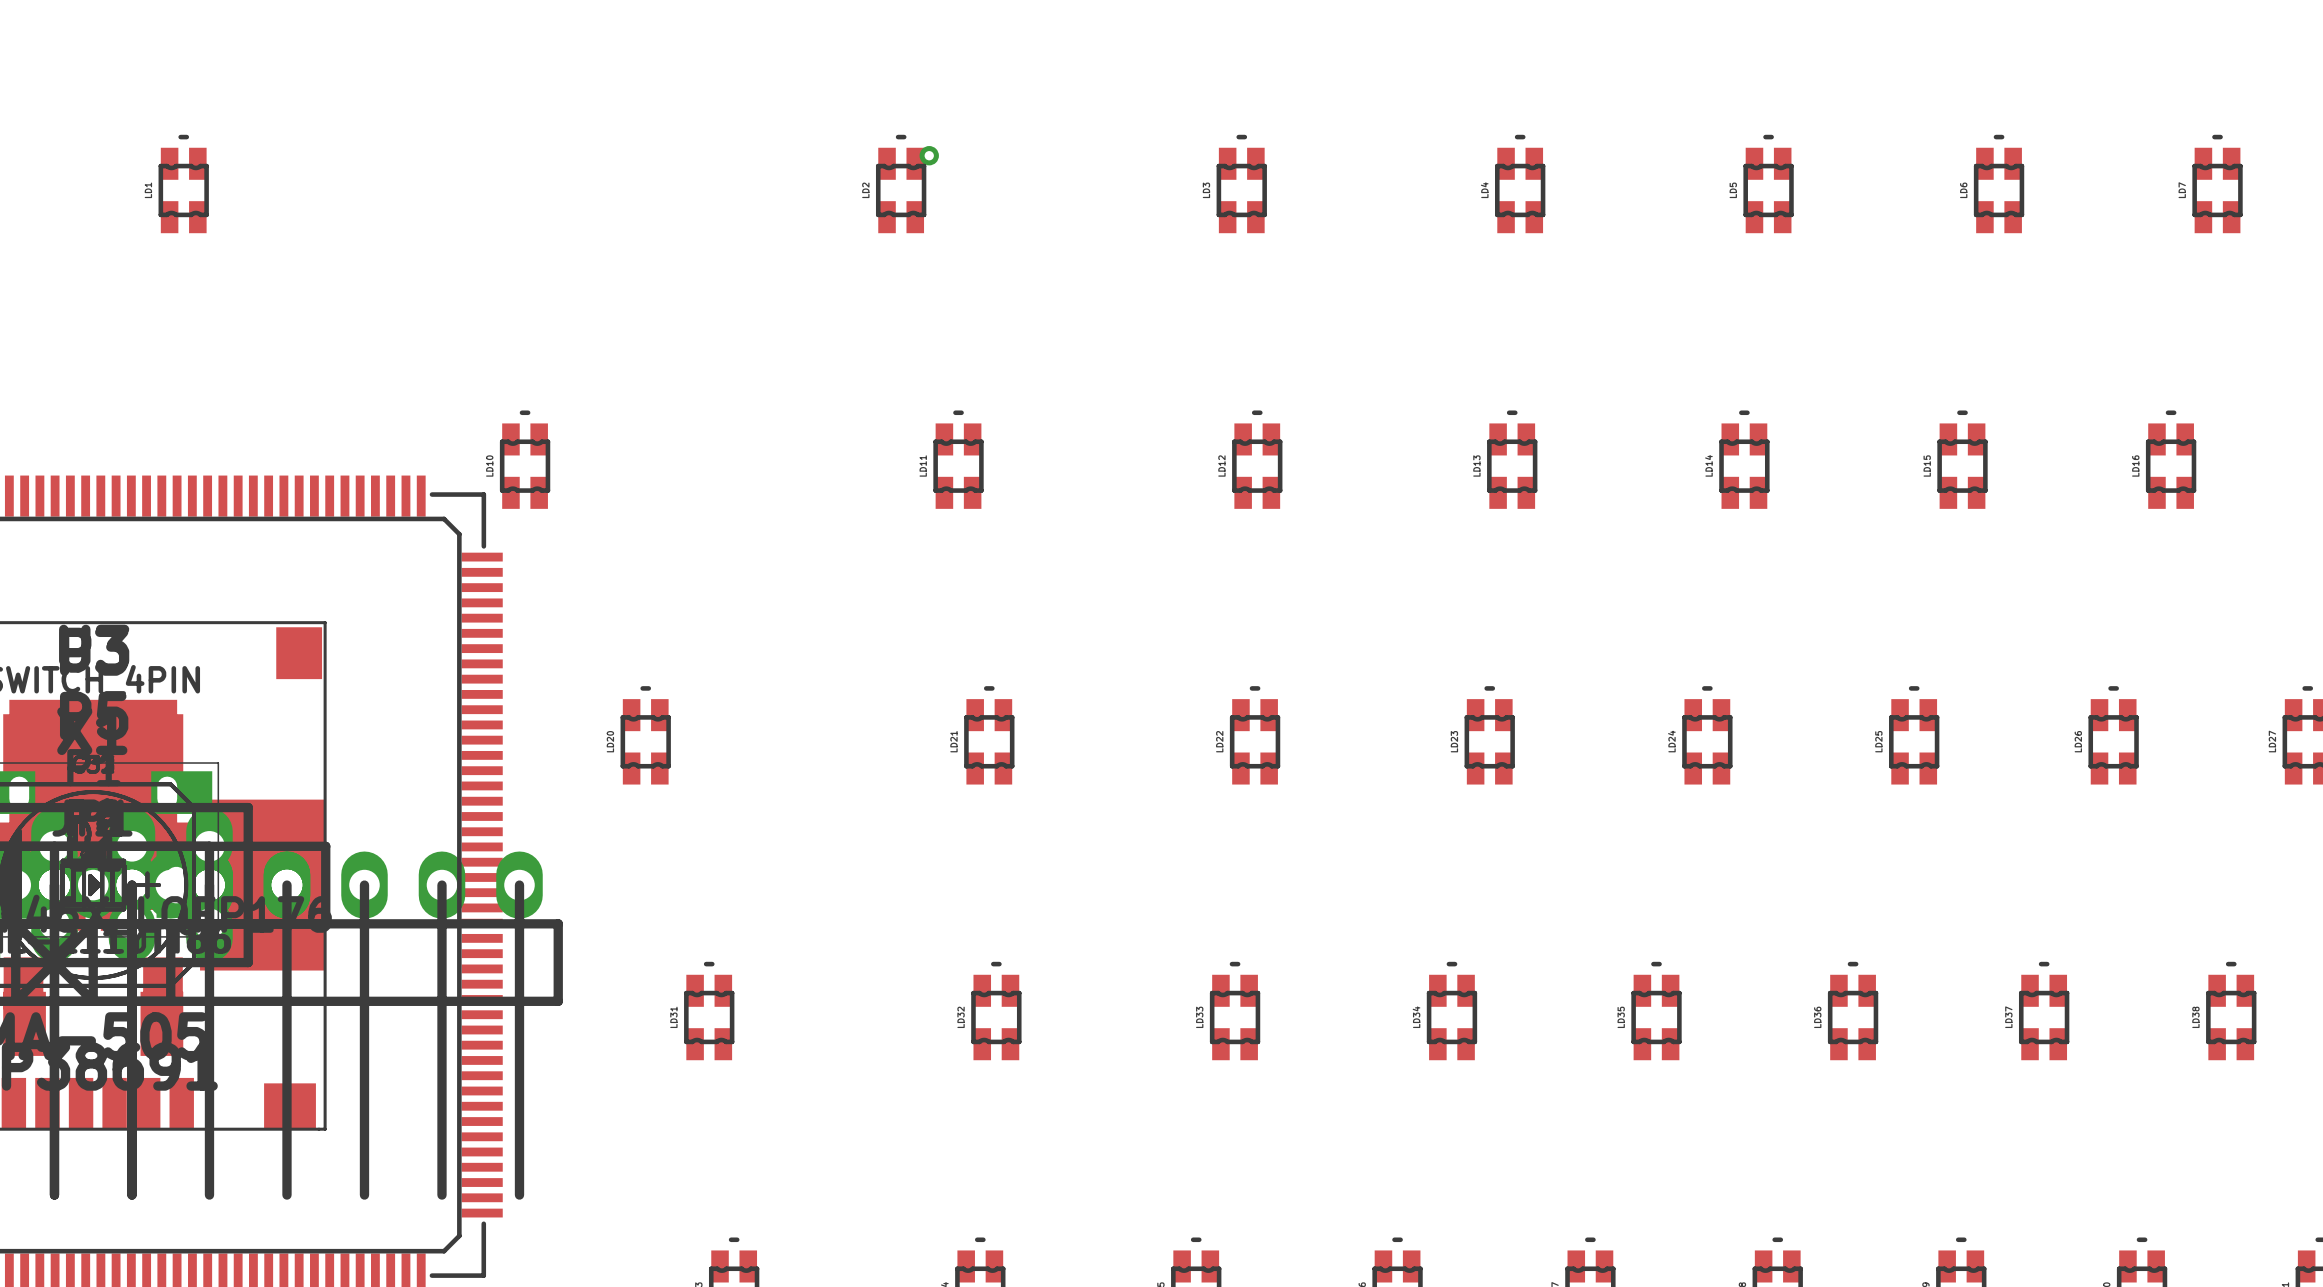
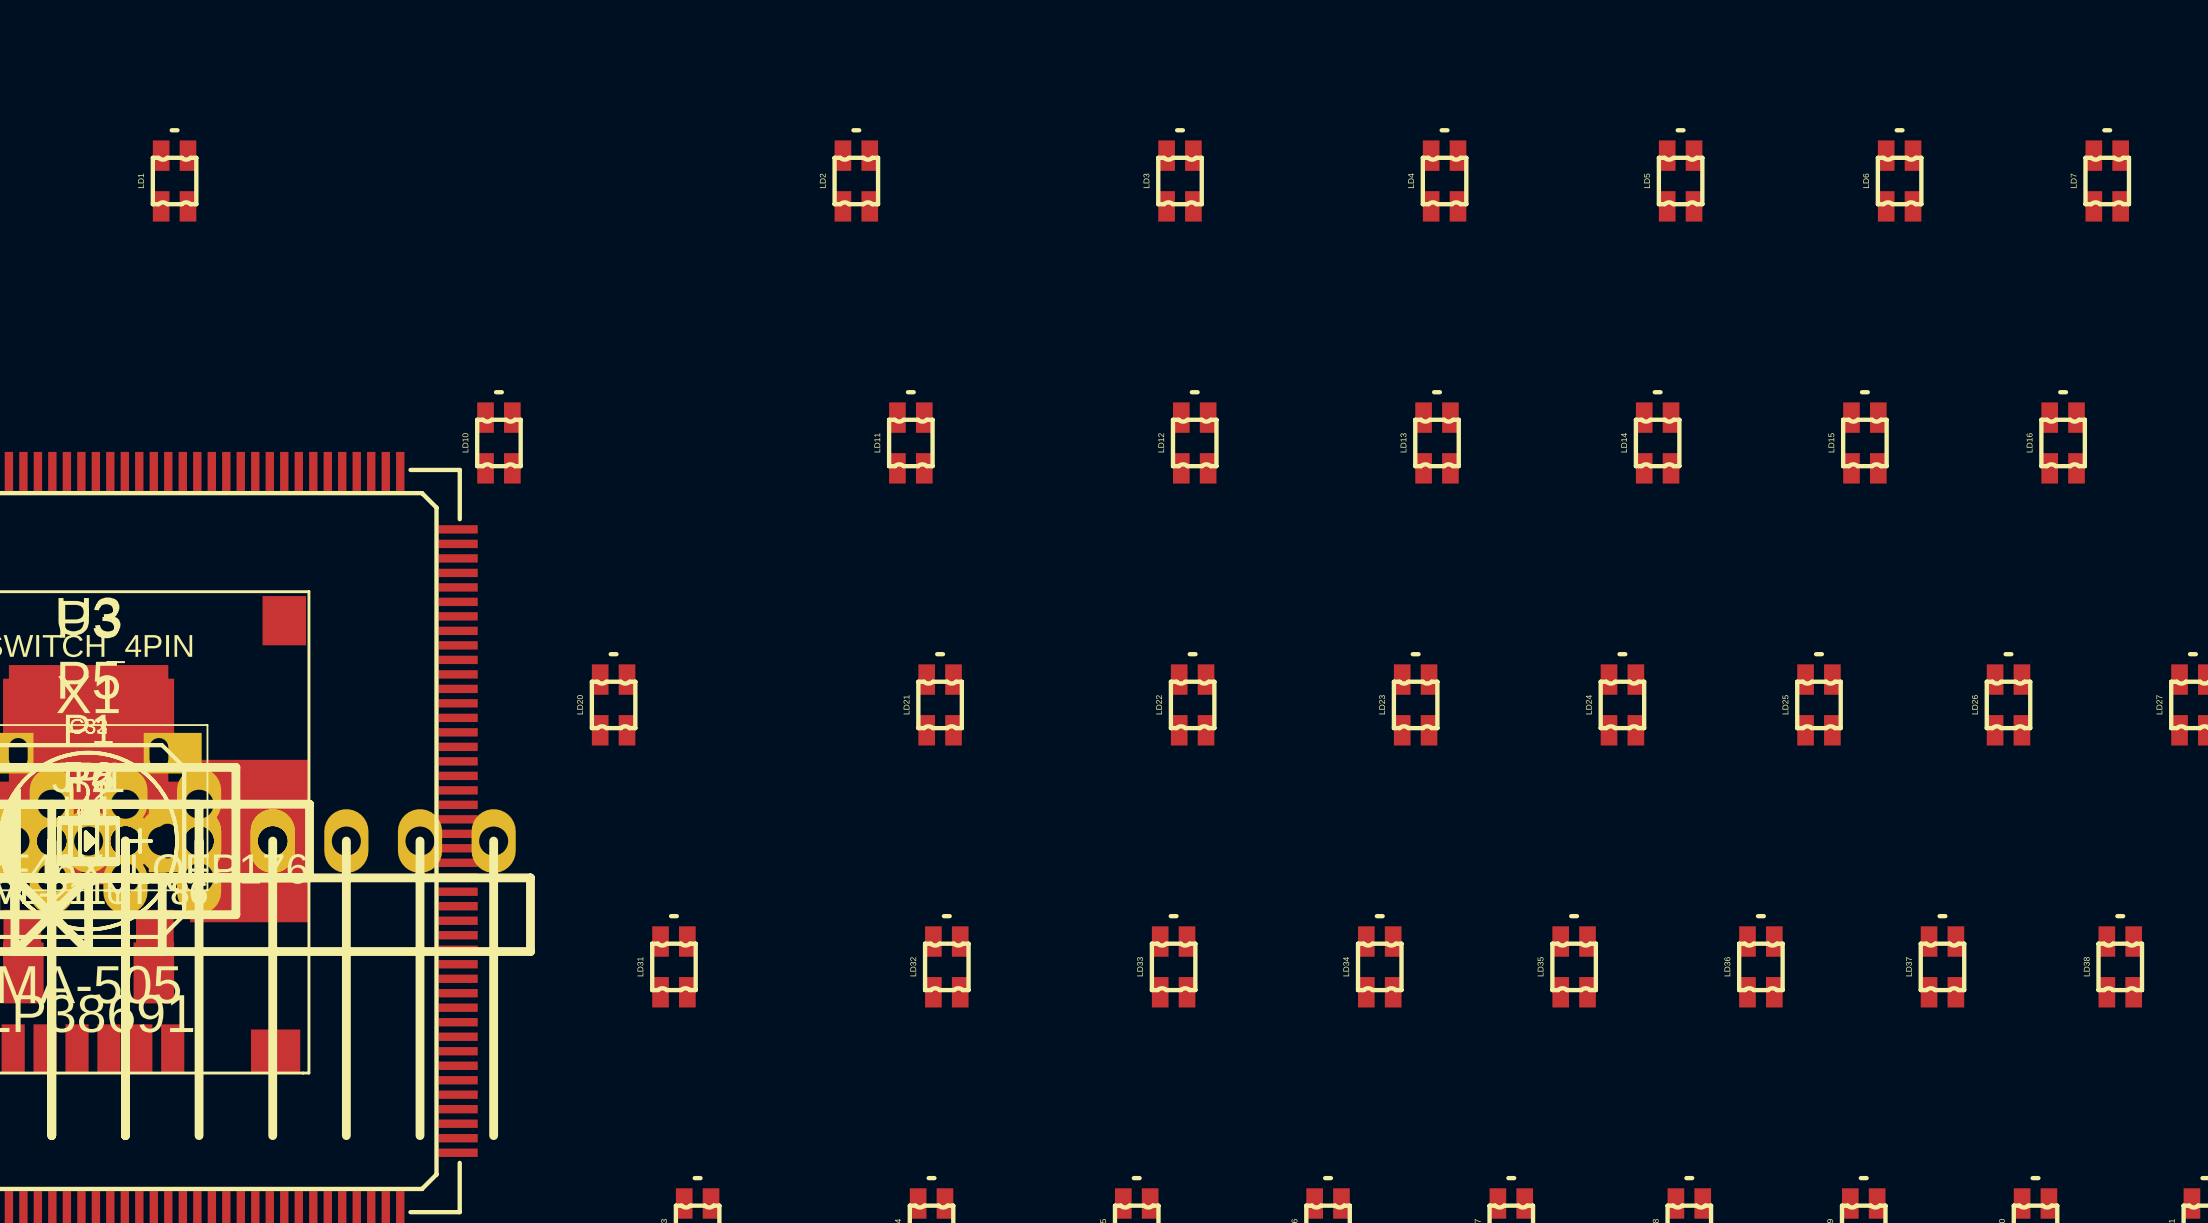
via: (929, 155) -> none

